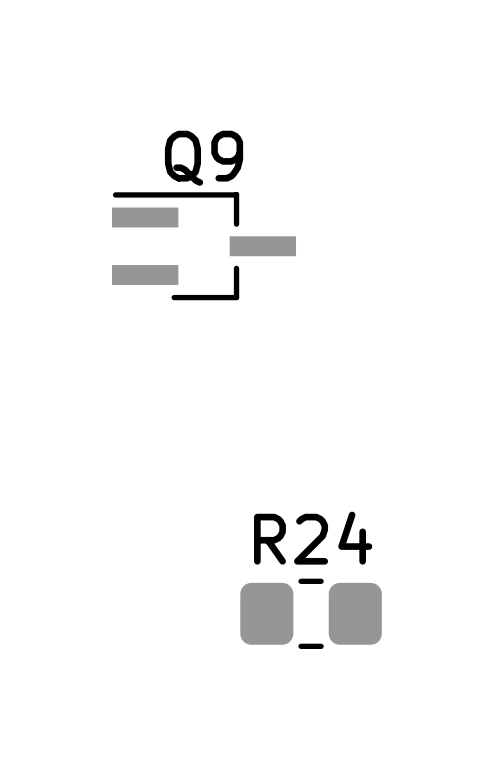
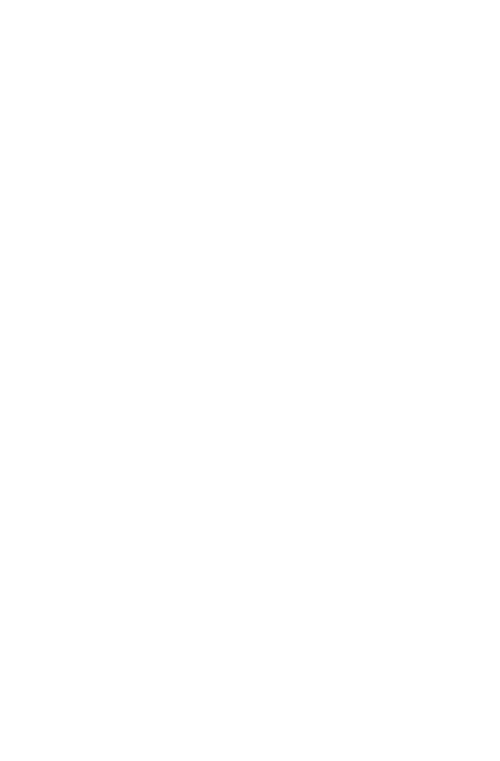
Q9: (204, 246) -> none
R24: (311, 613) -> none

